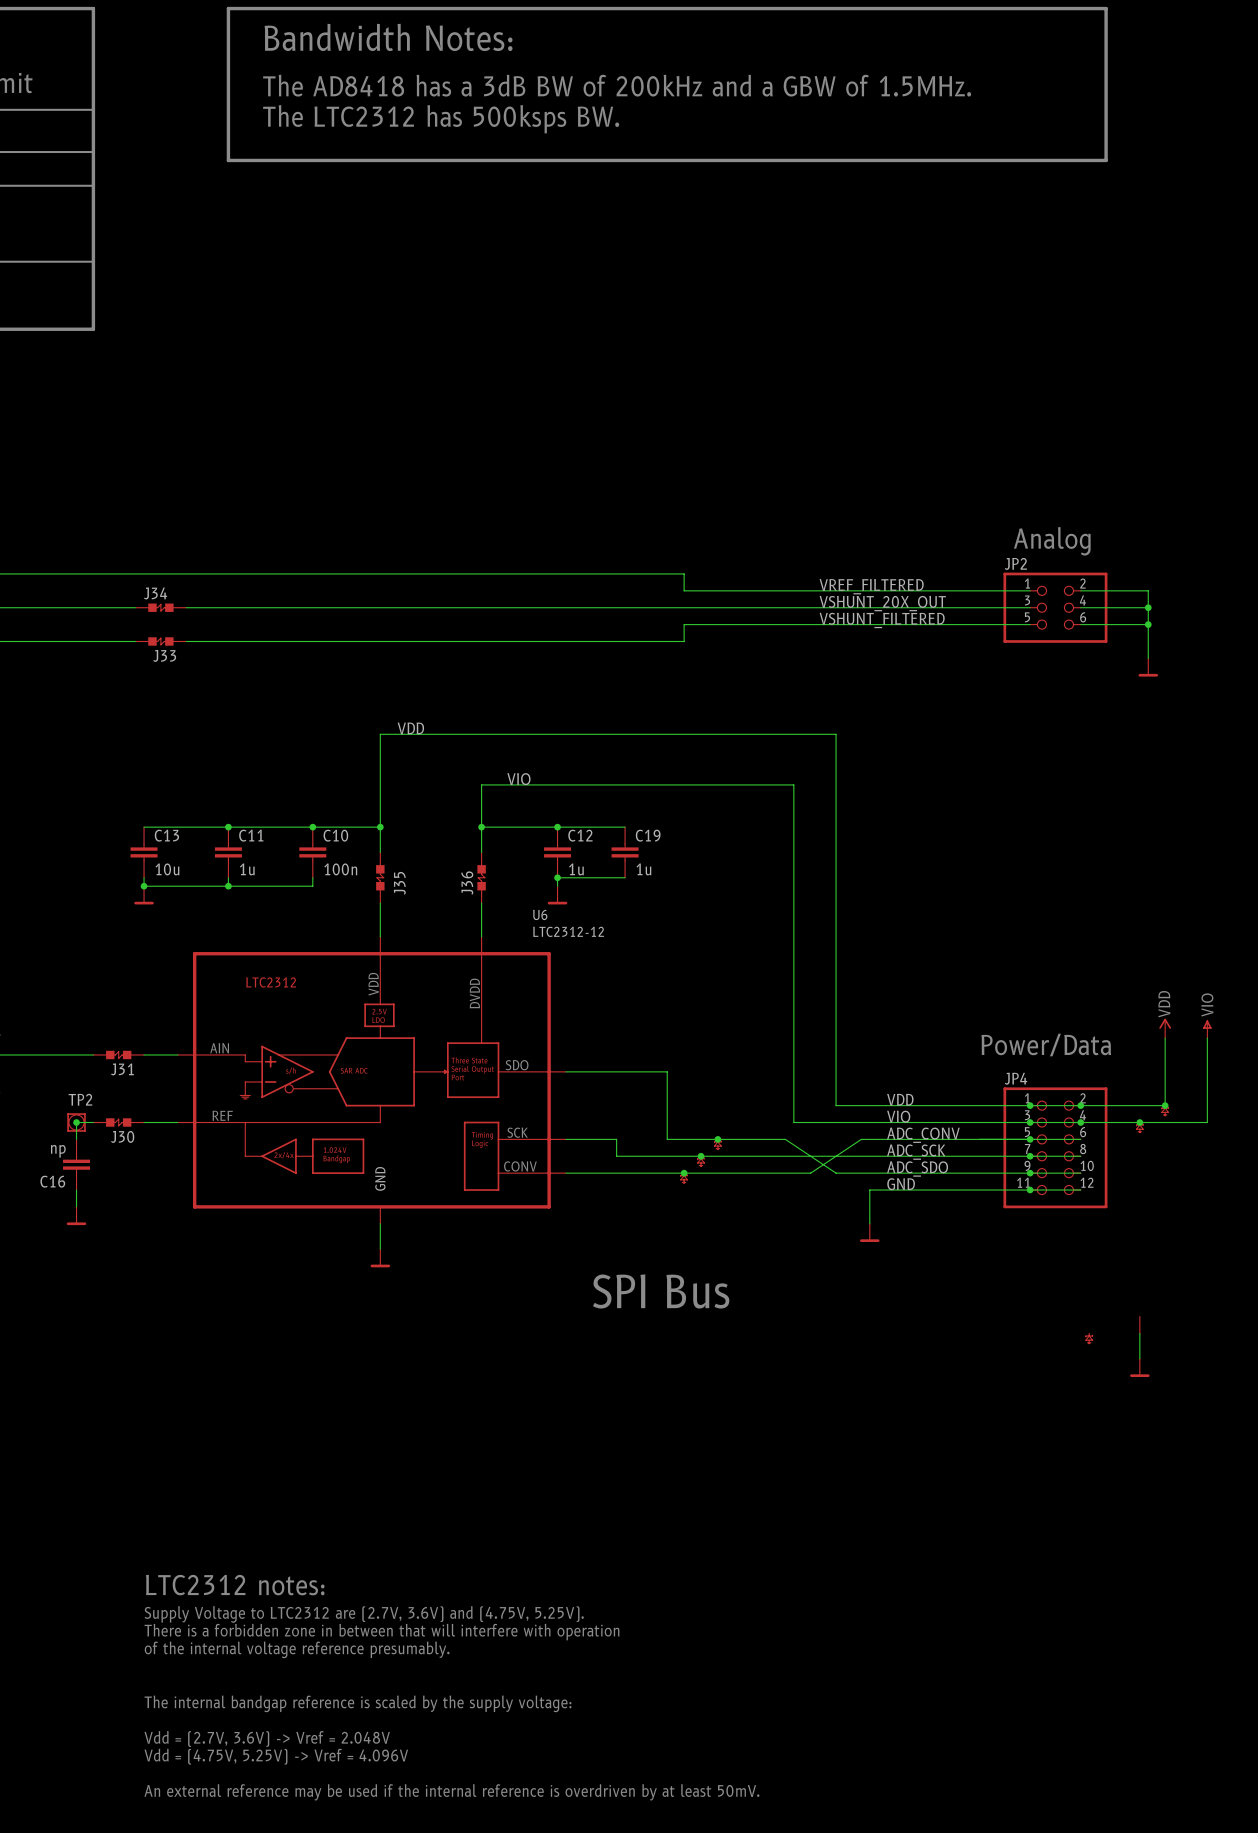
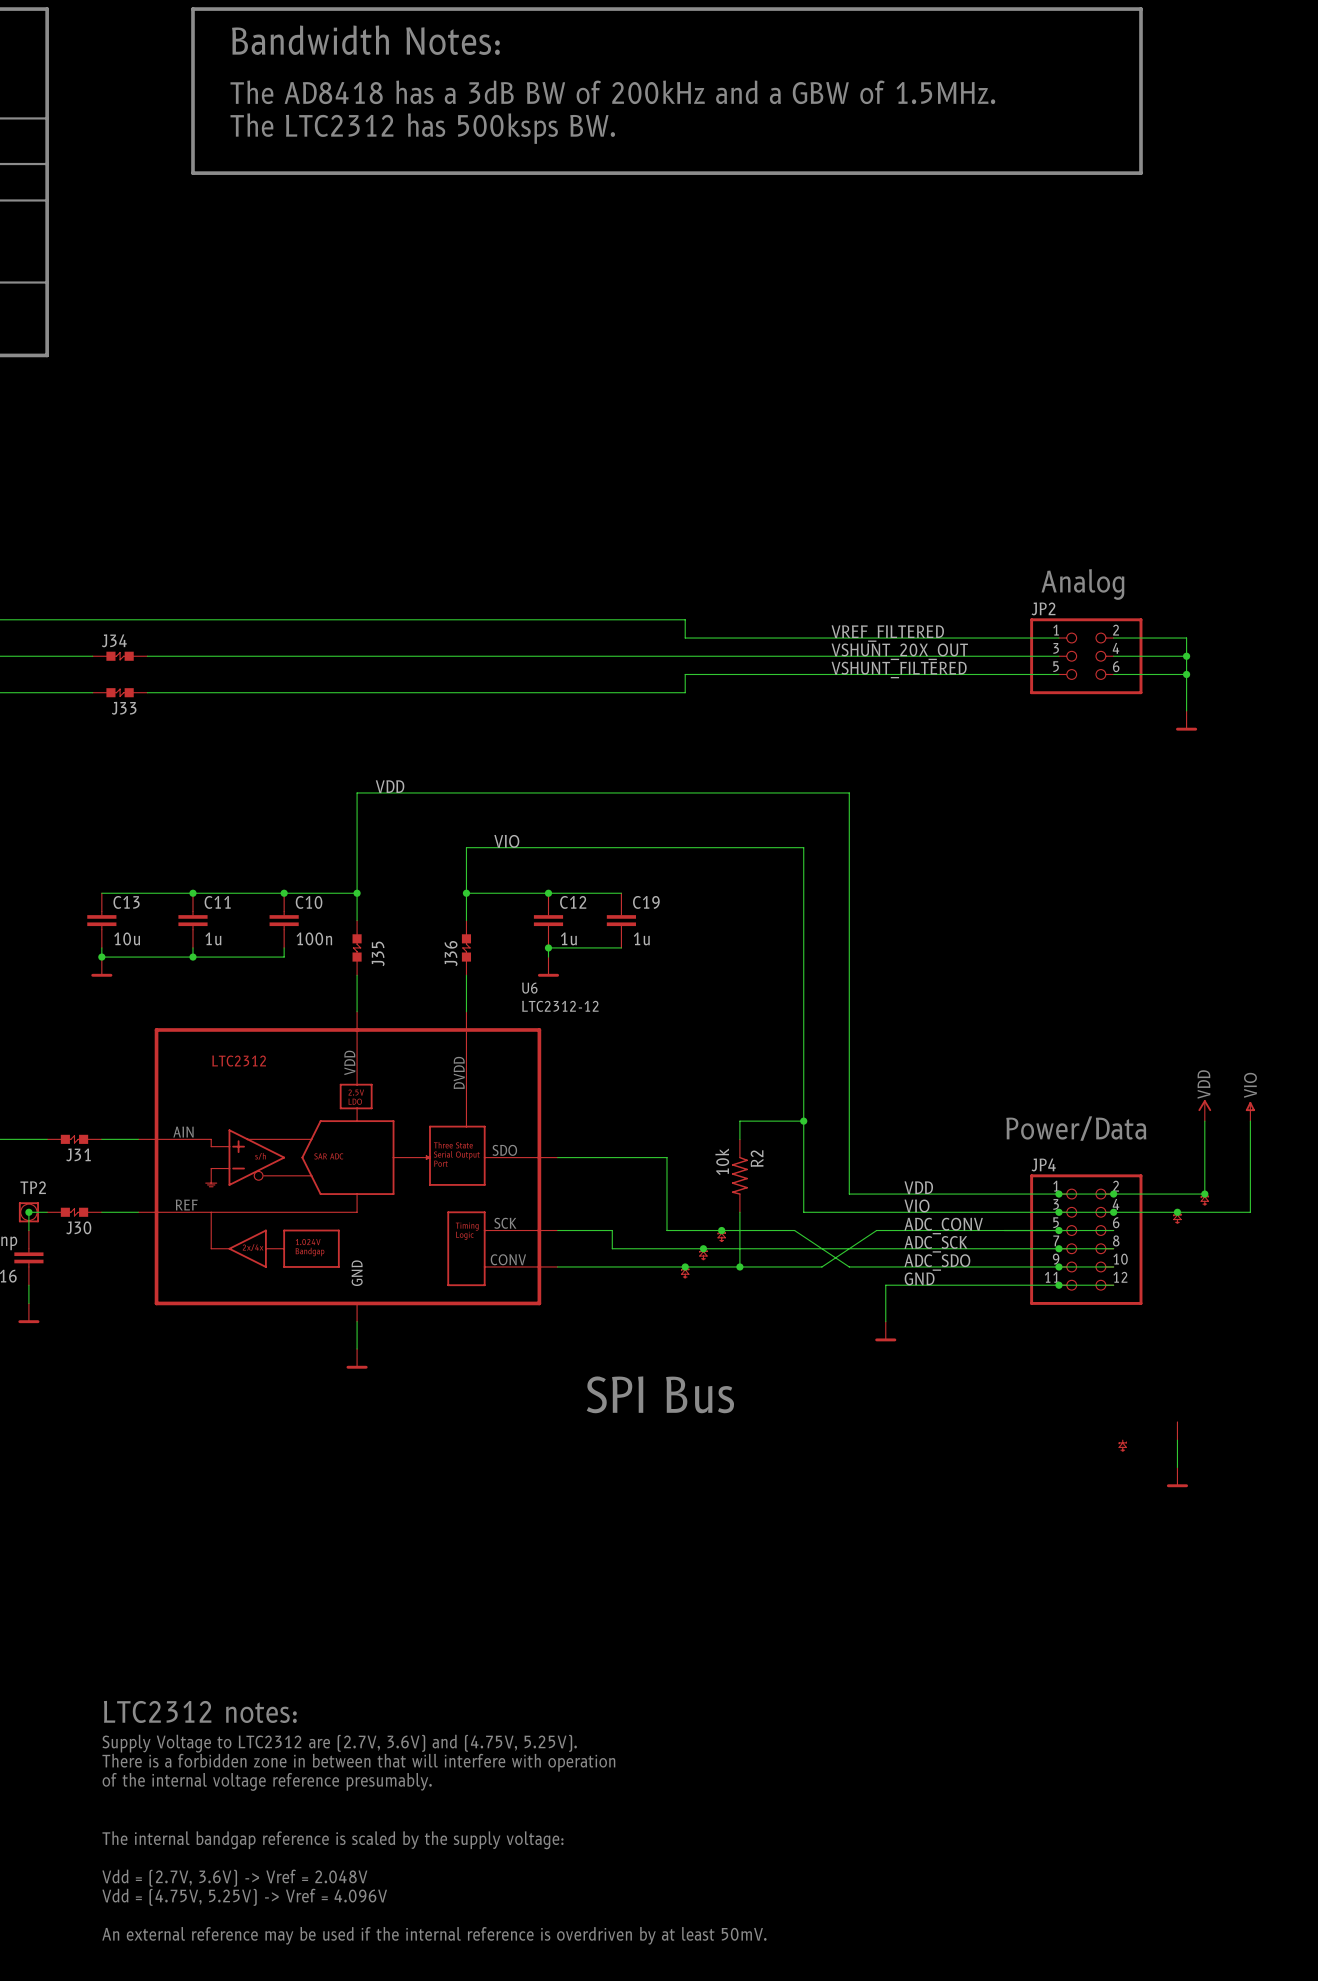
wire: none -> (803, 1121) (739, 1121) (739, 1139)
junction: none -> (803, 1121)
R2: none -> 10k (739, 1175)
wire: none -> (739, 1212) (739, 1266)
junction: none -> (739, 1266)

